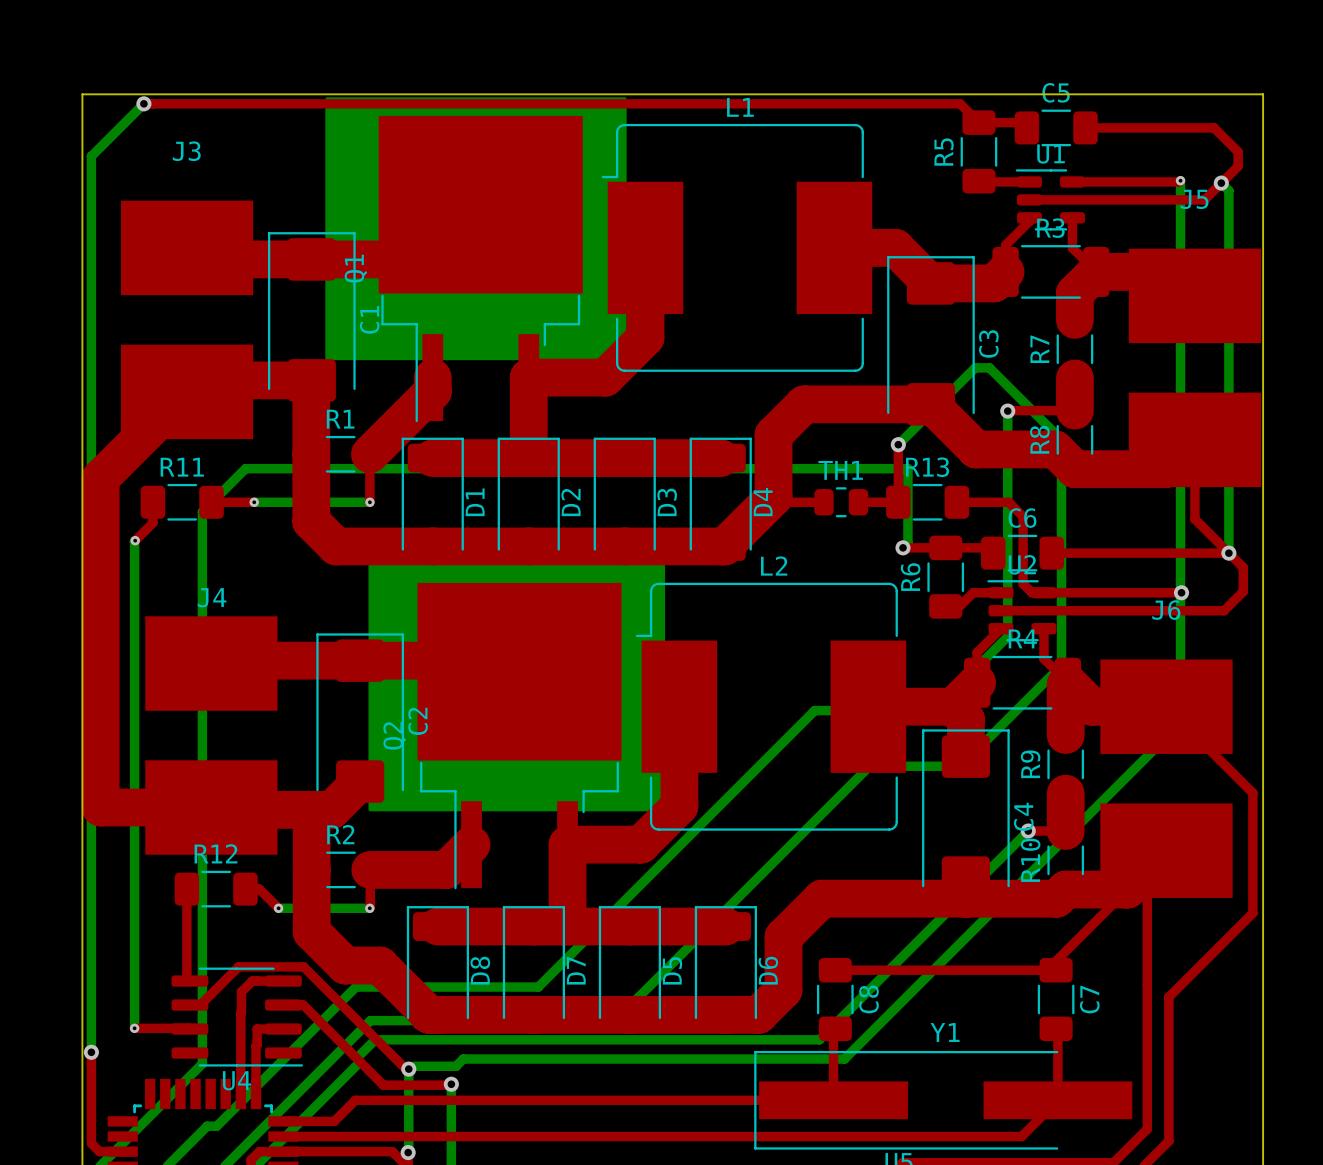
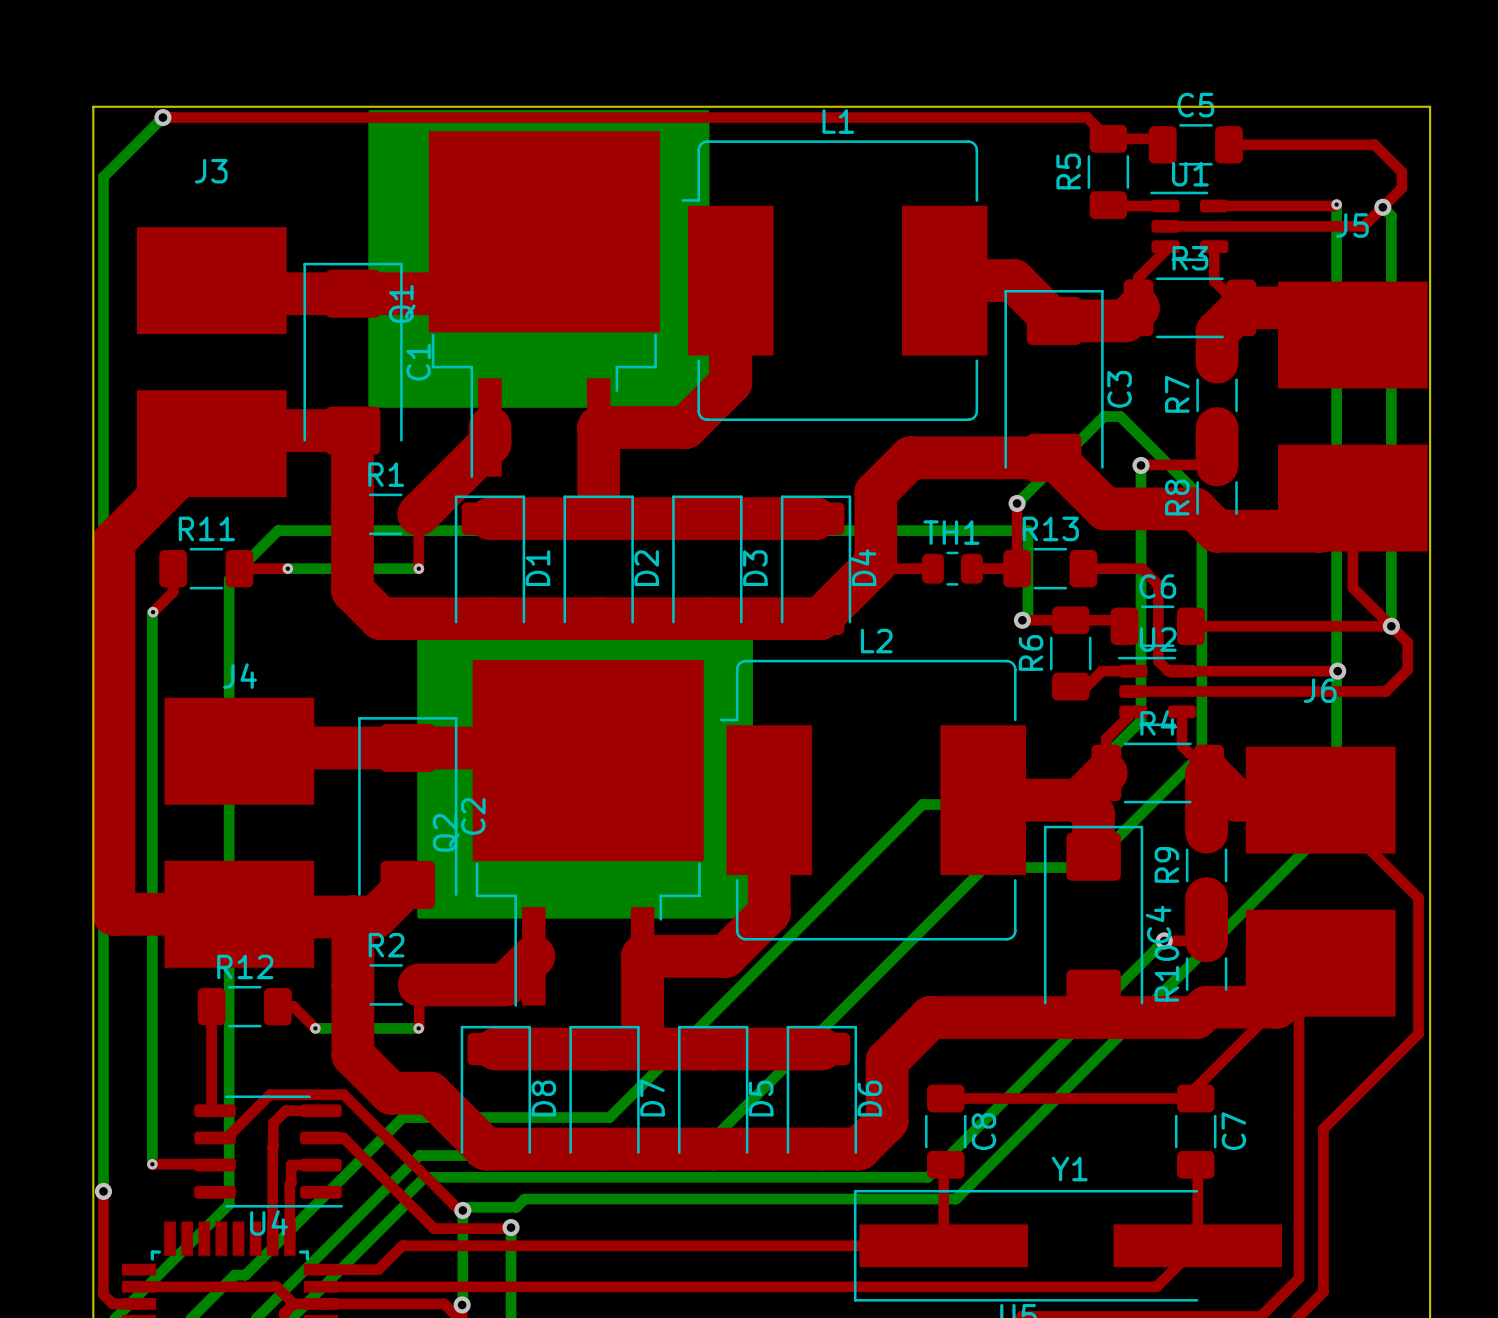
top track: none -> (139, 1286) (276, 1286) (293, 1303)

